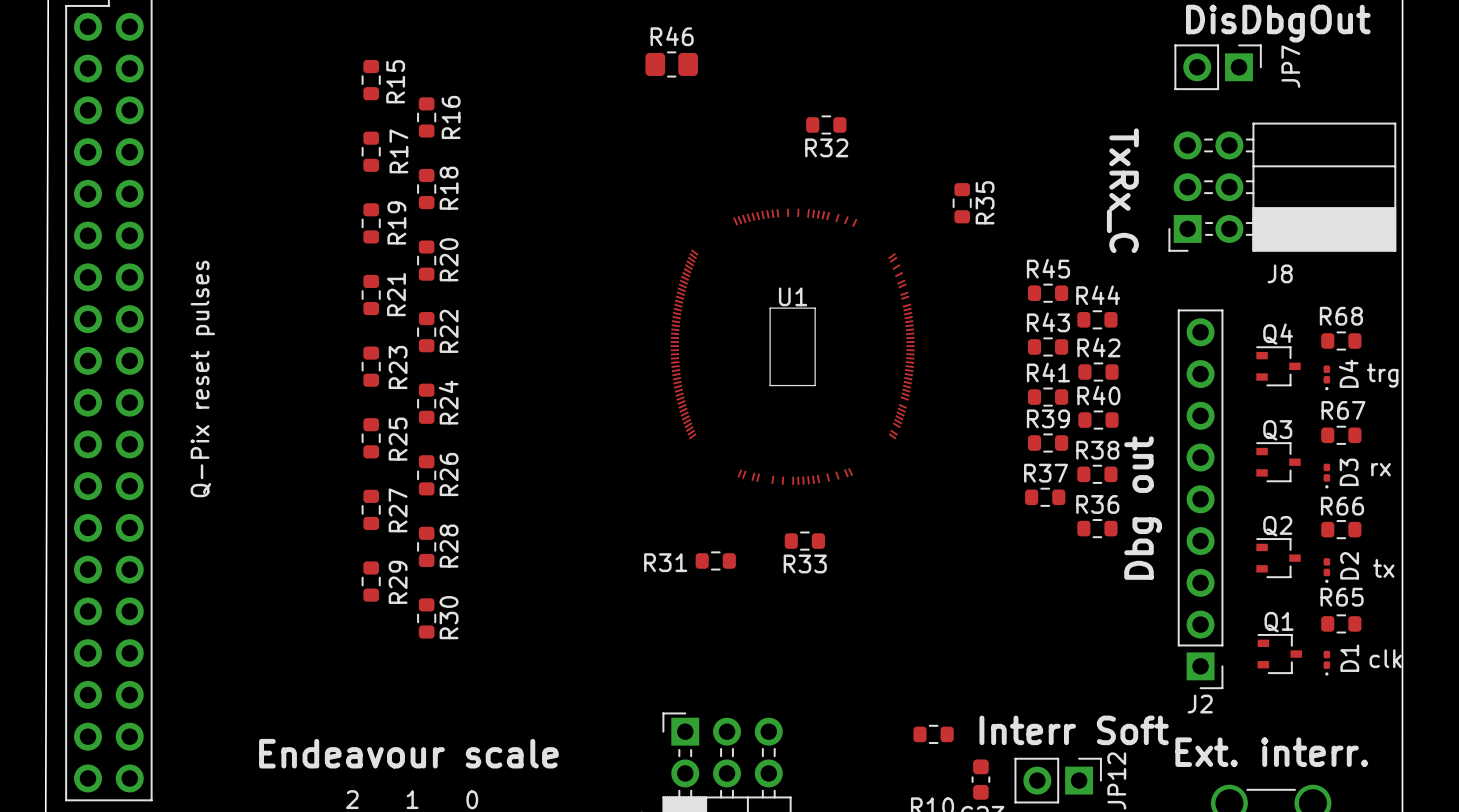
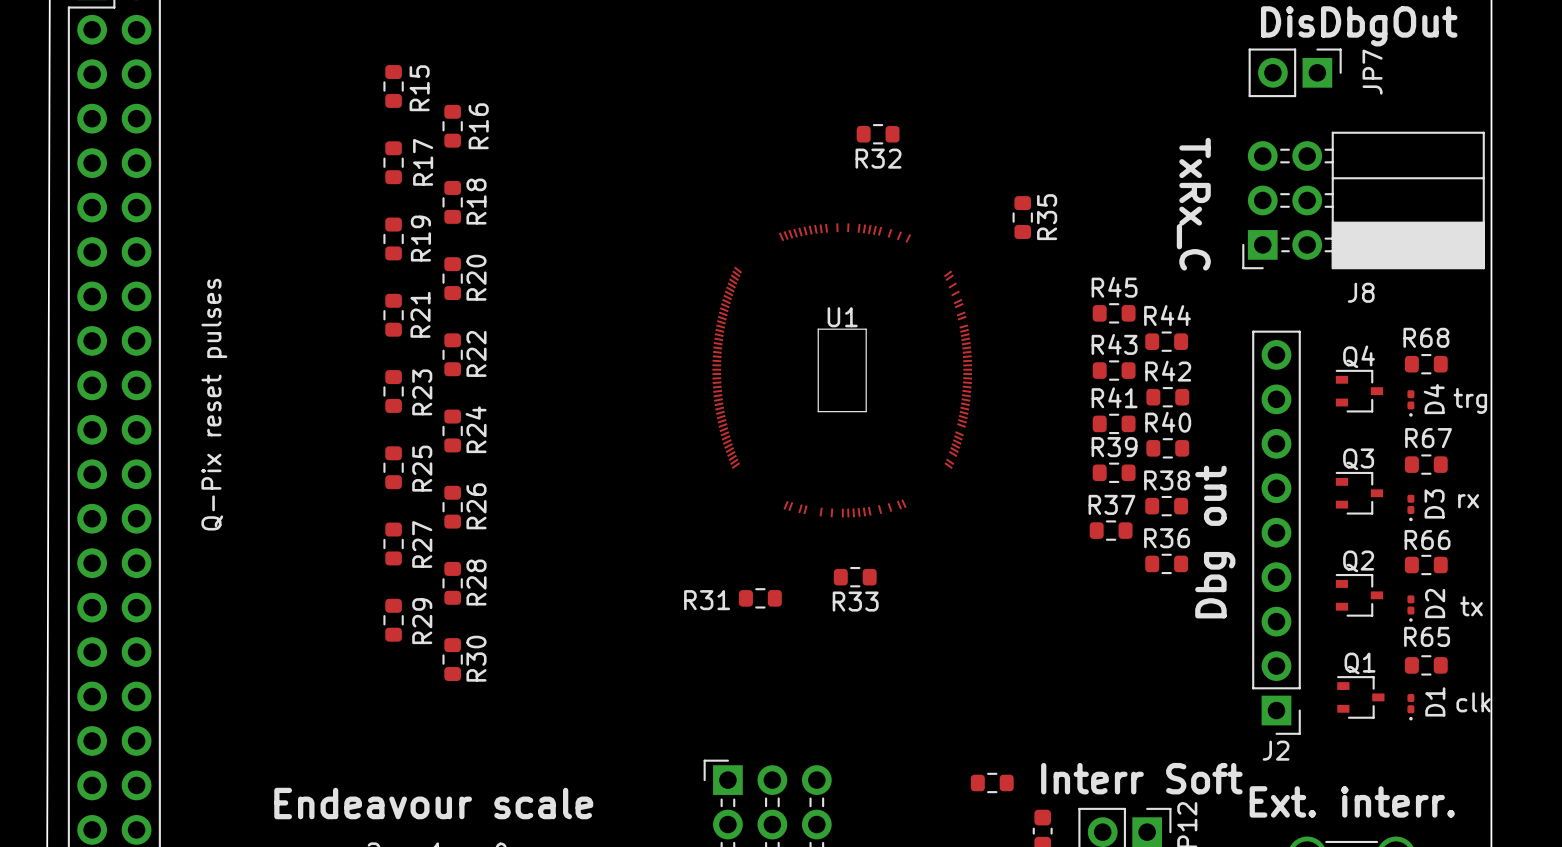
R46: (671, 64) -> none

